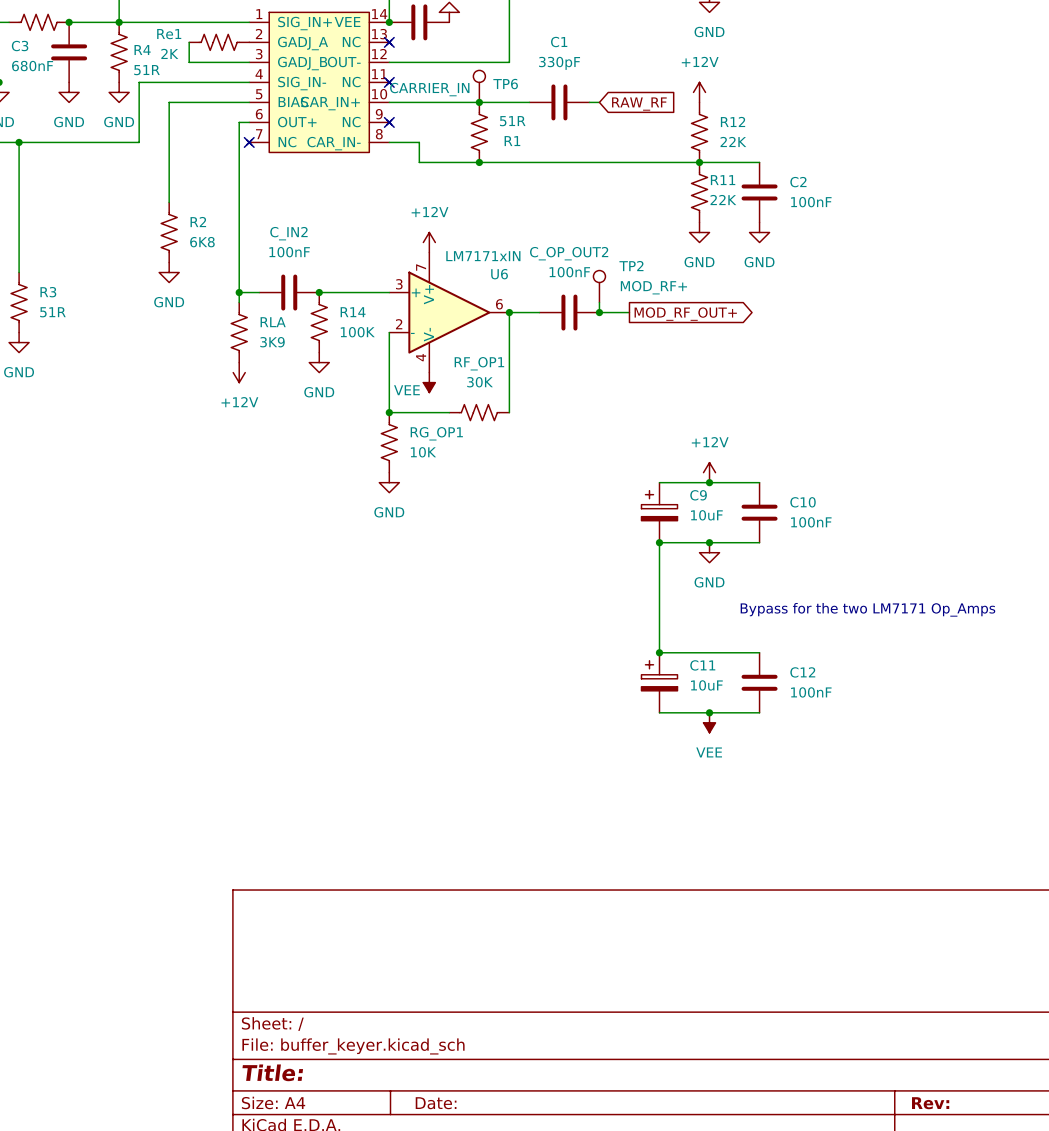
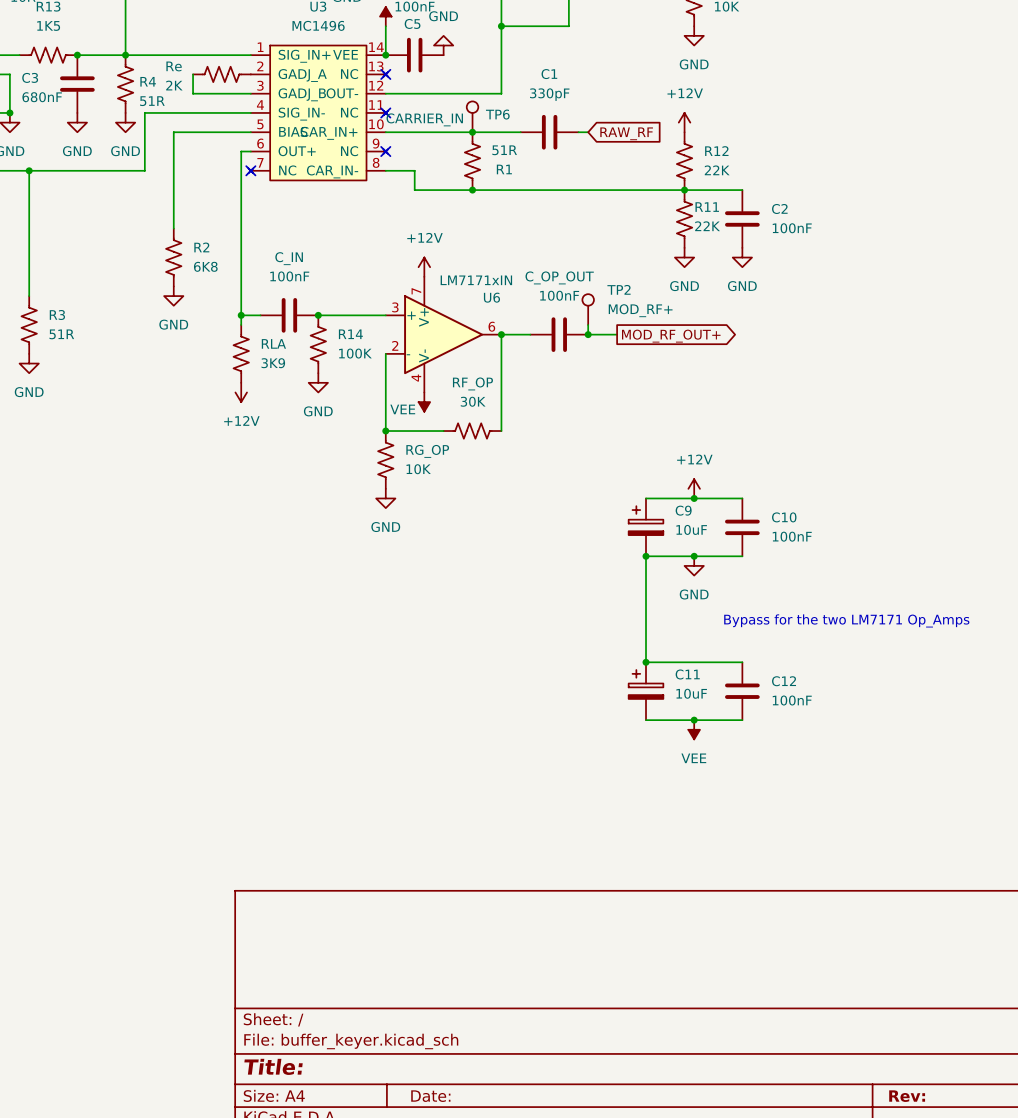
Re1 name: Re1 (169, 34) -> Re (174, 66)
C_IN2 name: C_IN2 (288, 233) -> C_IN (289, 258)
C_OP_OUT2 name: C_OP_OUT2 (569, 253) -> C_OP_OUT (559, 277)
RF_OP1 name: RF_OP1 (479, 363) -> RF_OP (472, 383)
RG_OP1 name: RG_OP1 (436, 433) -> RG_OP (427, 451)

